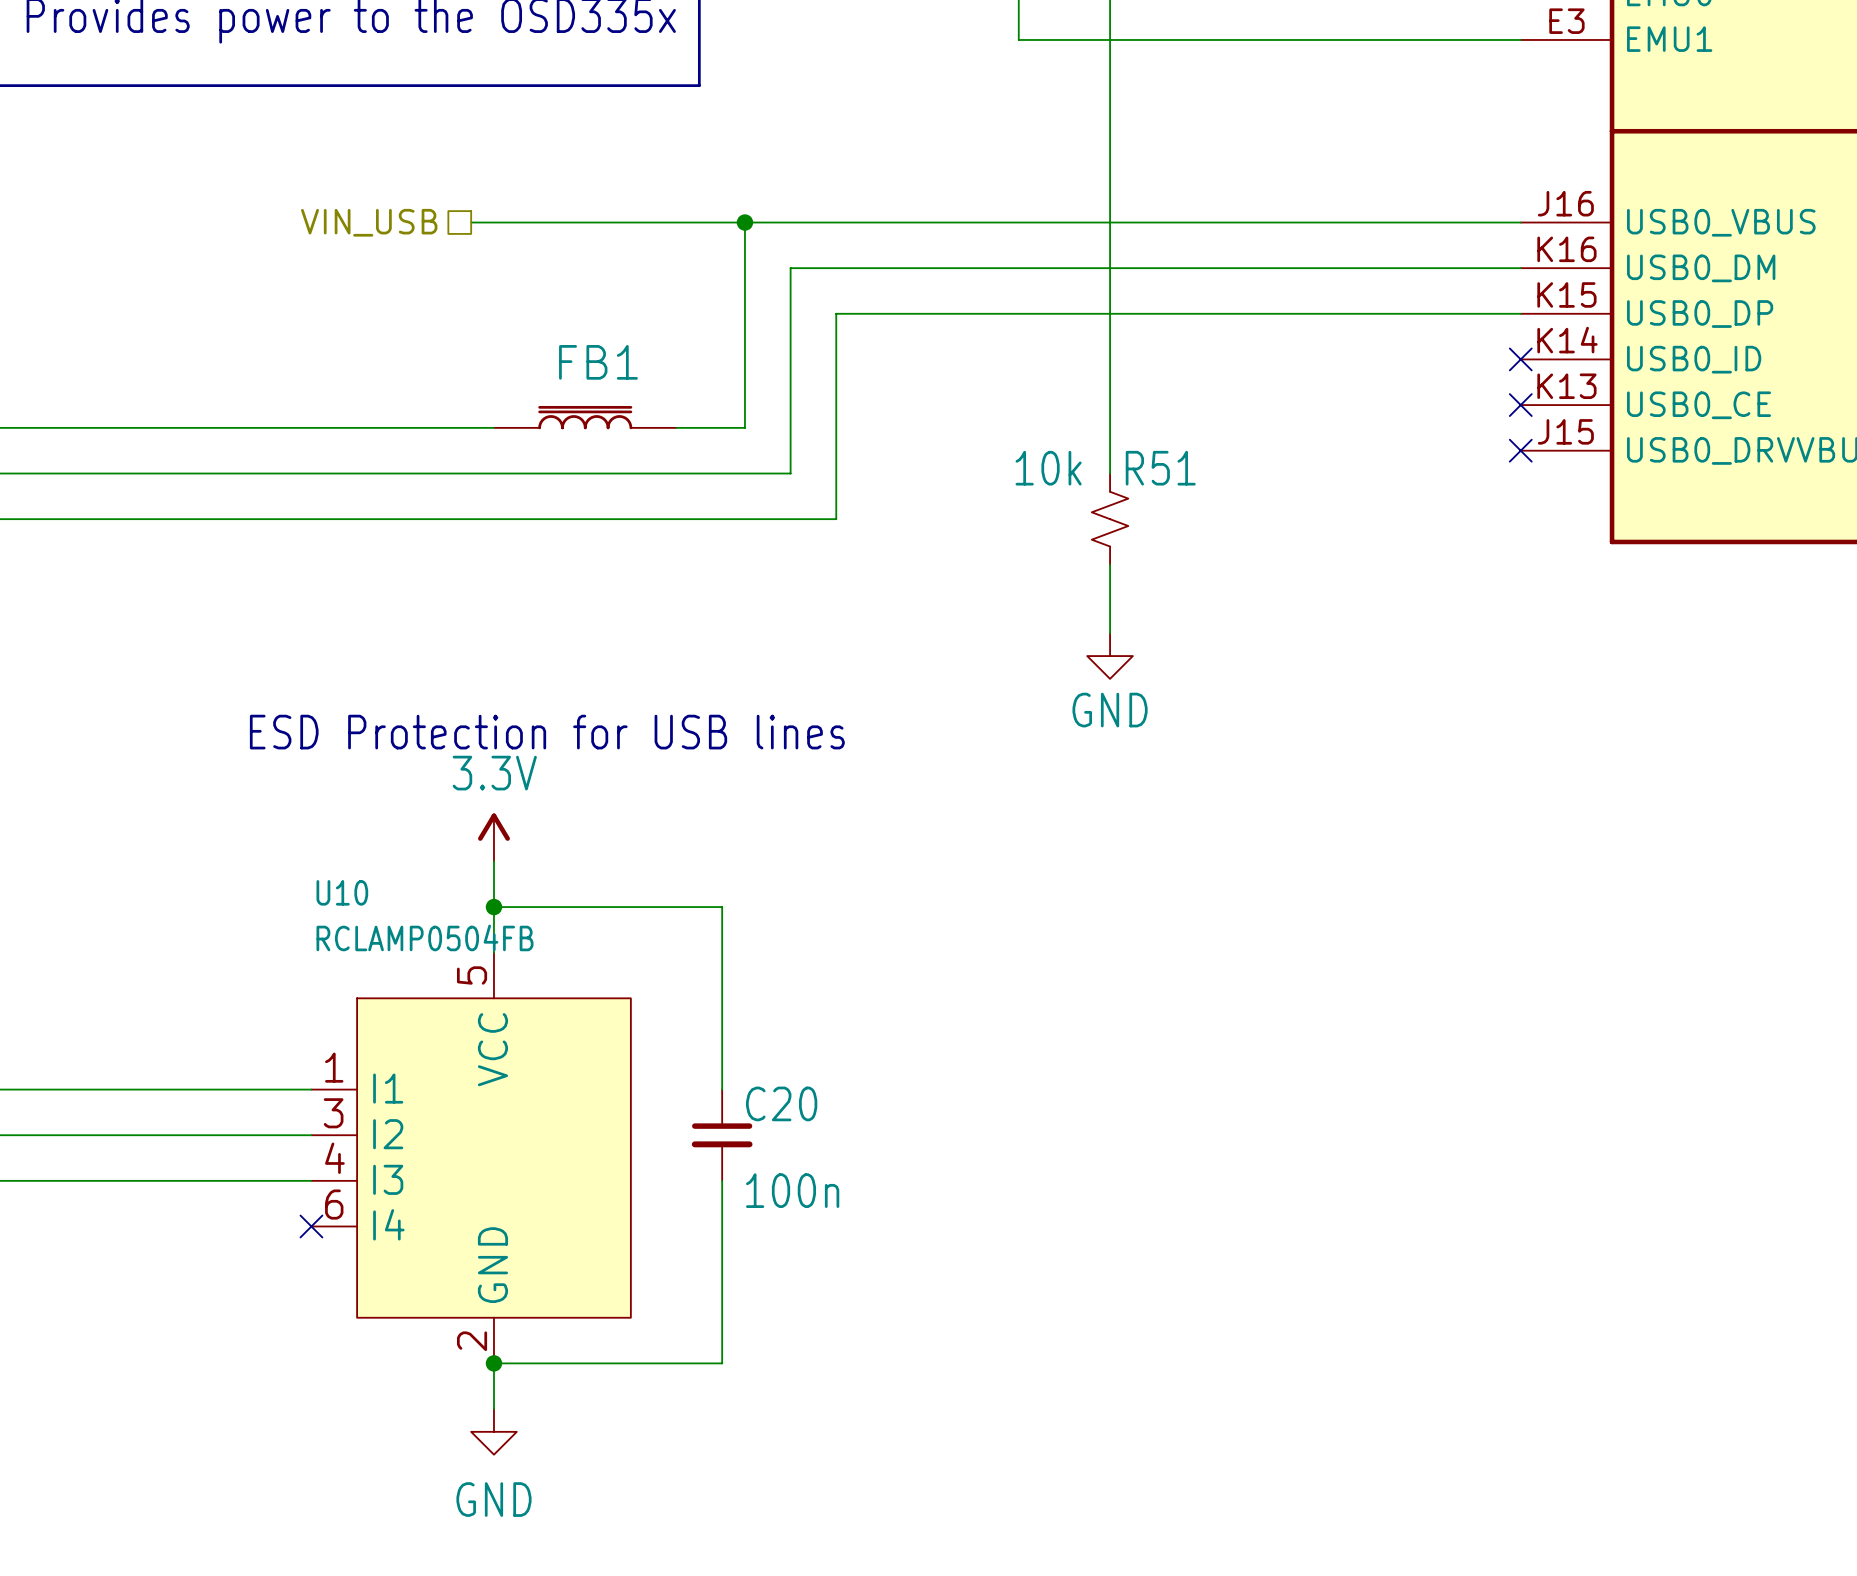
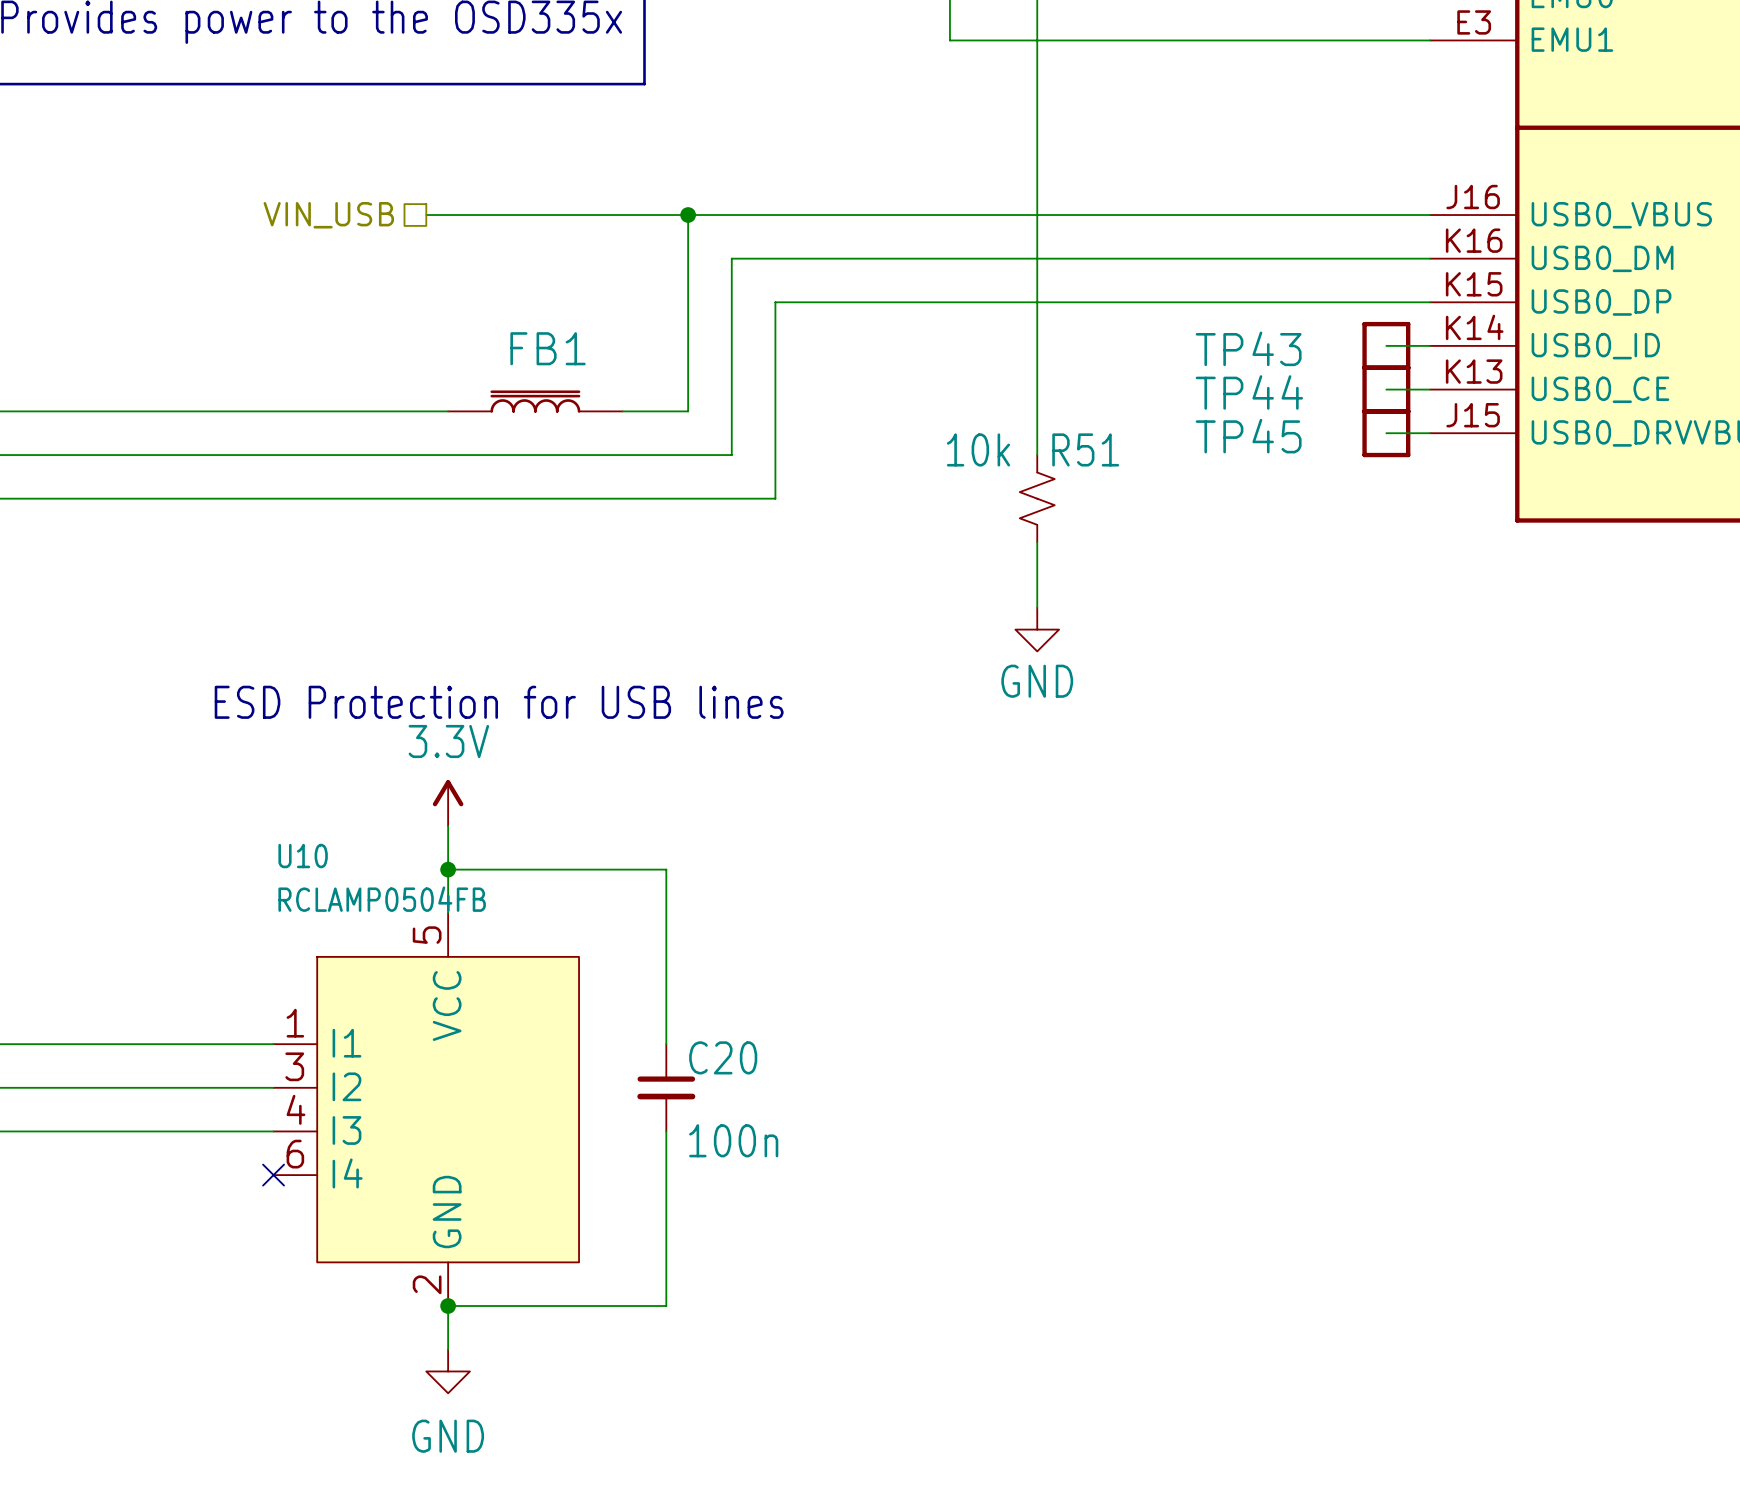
wire: none -> (1386, 345) (1430, 345)
TP43: none -> (1386, 345)
no-connect mark: (1520, 359) -> none
wire: none -> (1386, 389) (1430, 389)
TP44: none -> (1386, 389)
no-connect mark: (1520, 405) -> none
wire: none -> (1386, 433) (1430, 433)
TP45: none -> (1386, 433)
no-connect mark: (1520, 450) -> none

